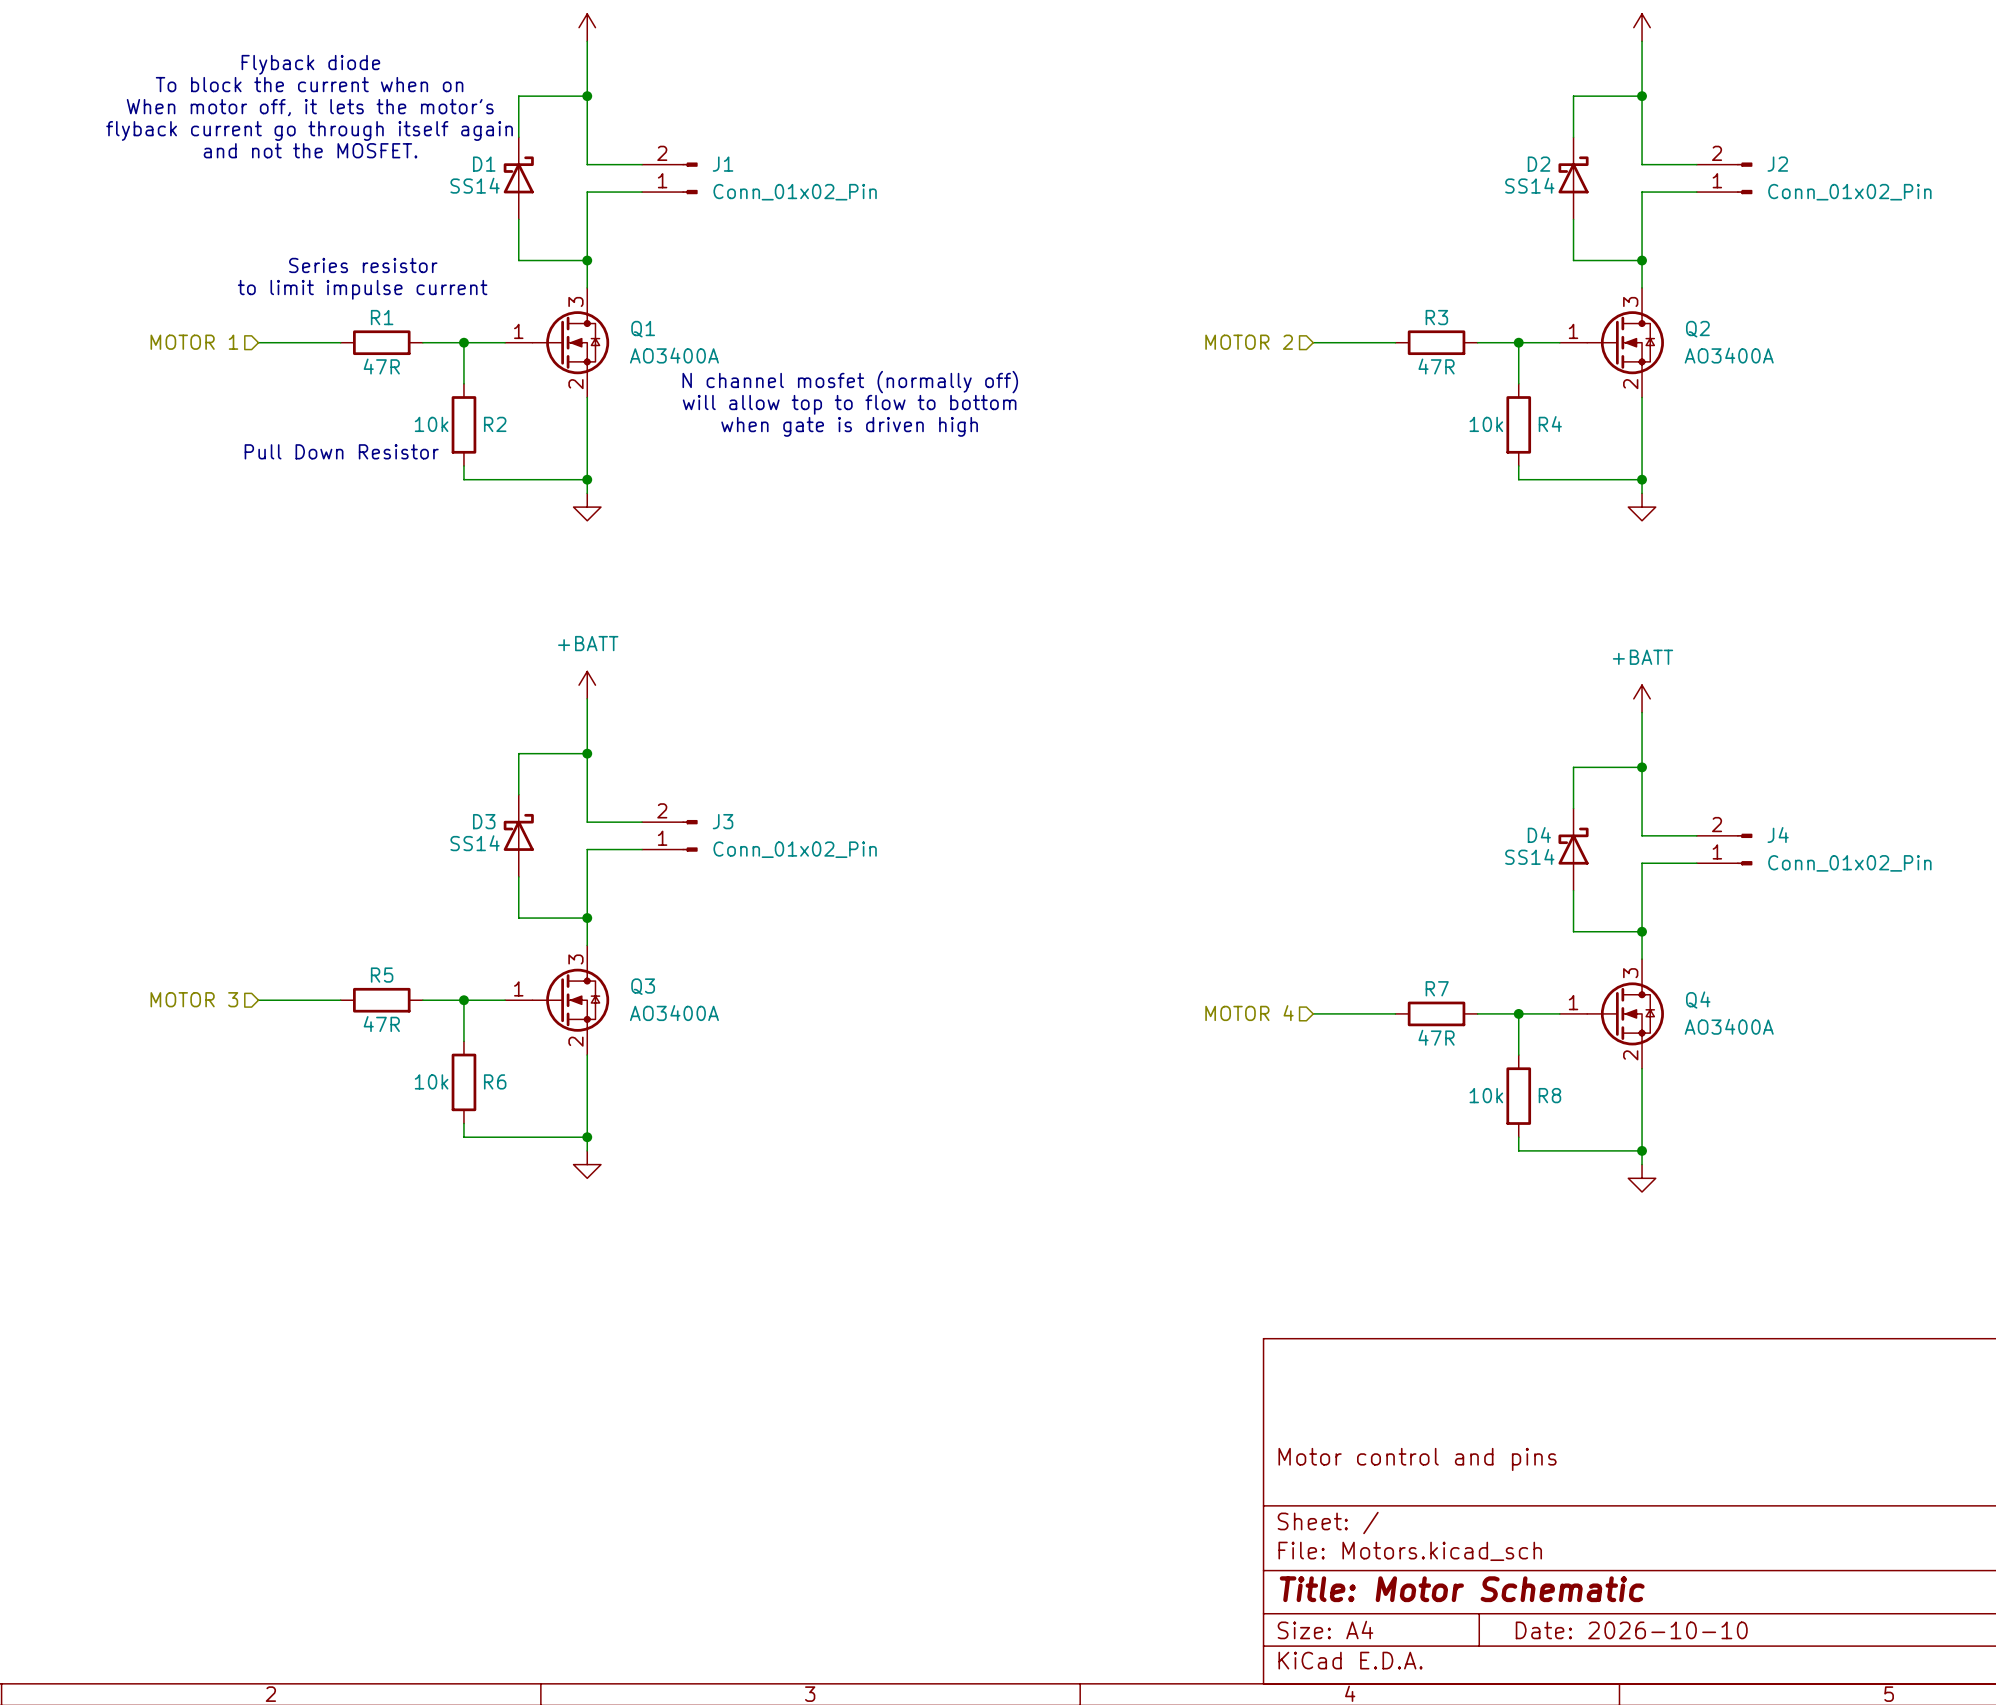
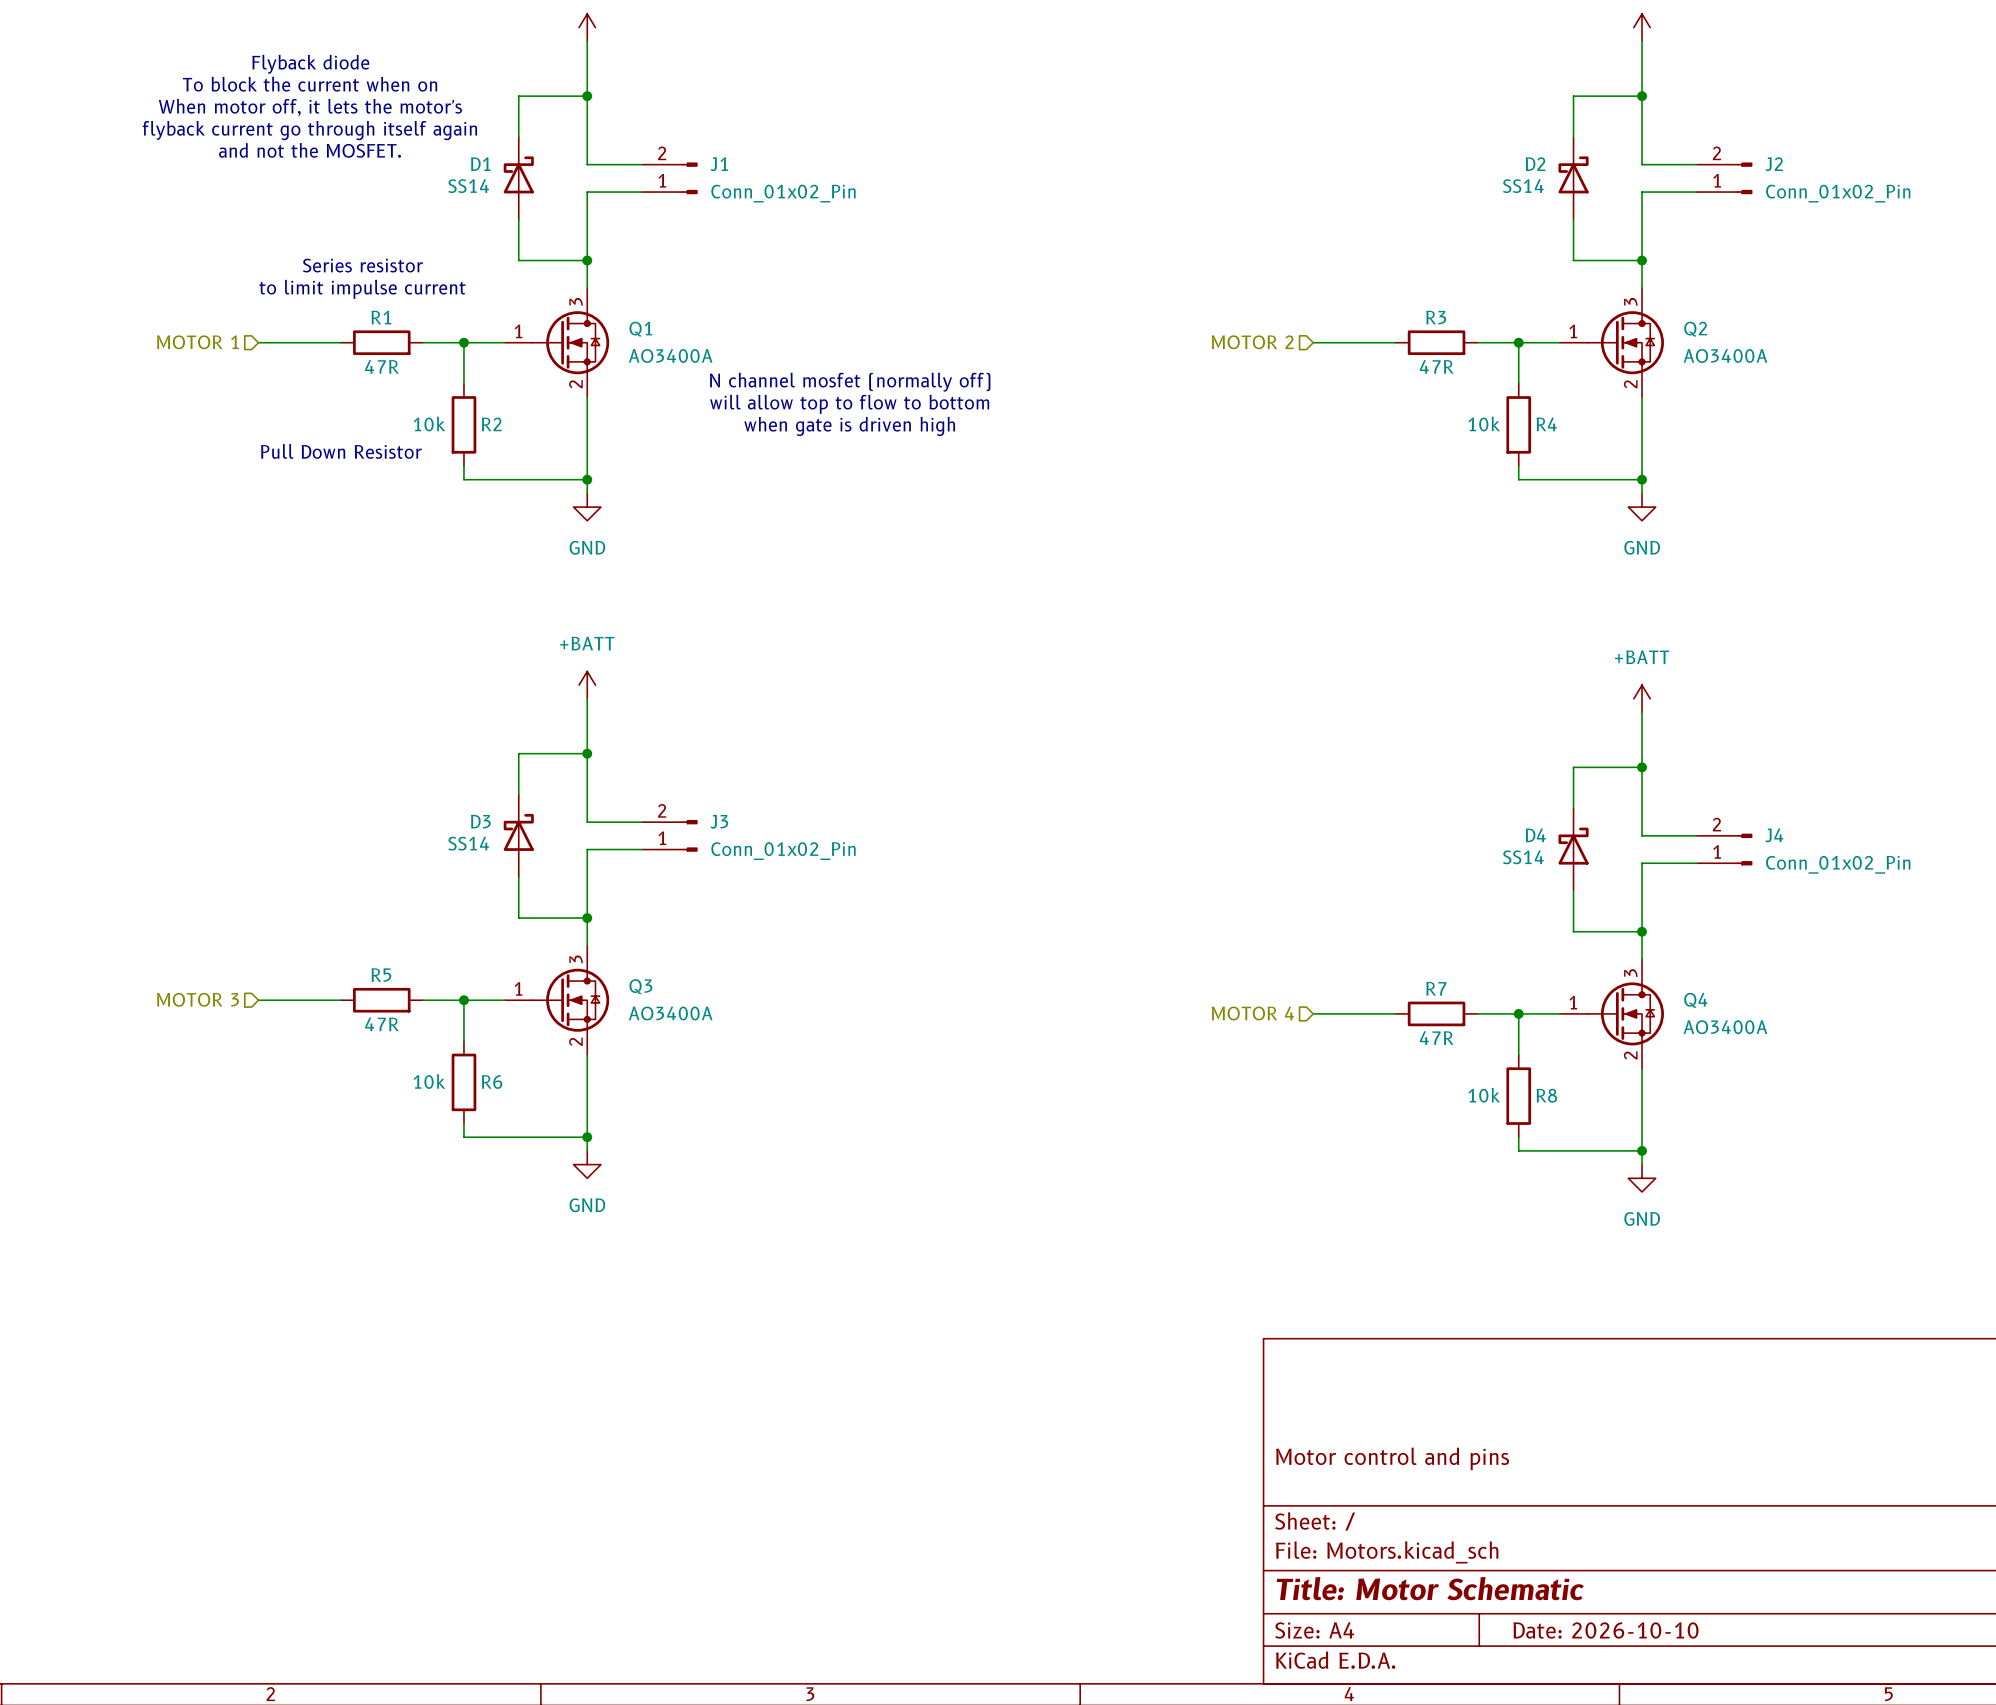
power symbol text: none -> GND (587, 547)
power symbol text: none -> GND (1642, 547)
power symbol text: none -> GND (587, 1205)
power symbol text: none -> GND (1642, 1218)

